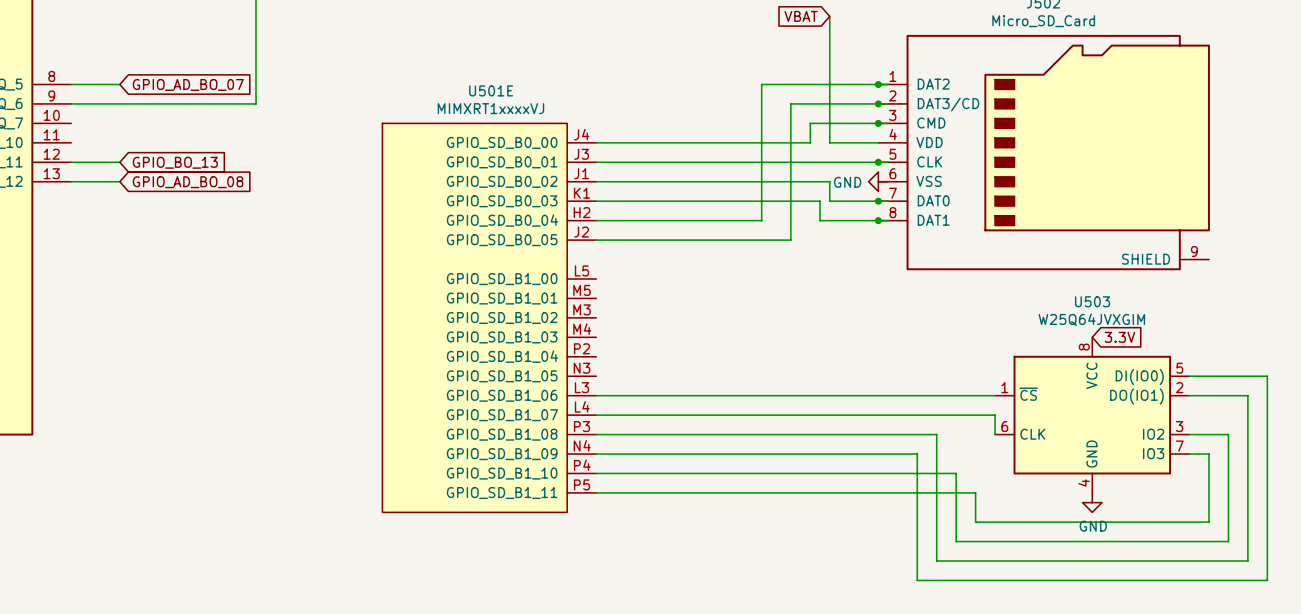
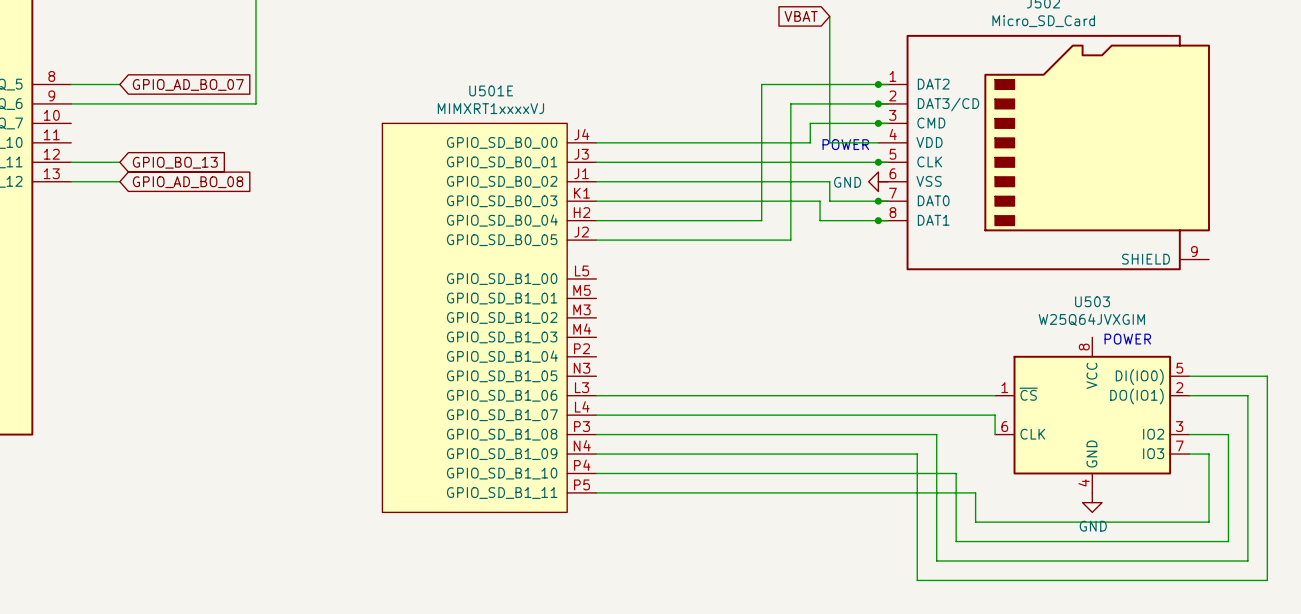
text: none -> POWER (845, 144)
global label: 3.3V (1119, 337) -> none
text: none -> POWER (1127, 339)

